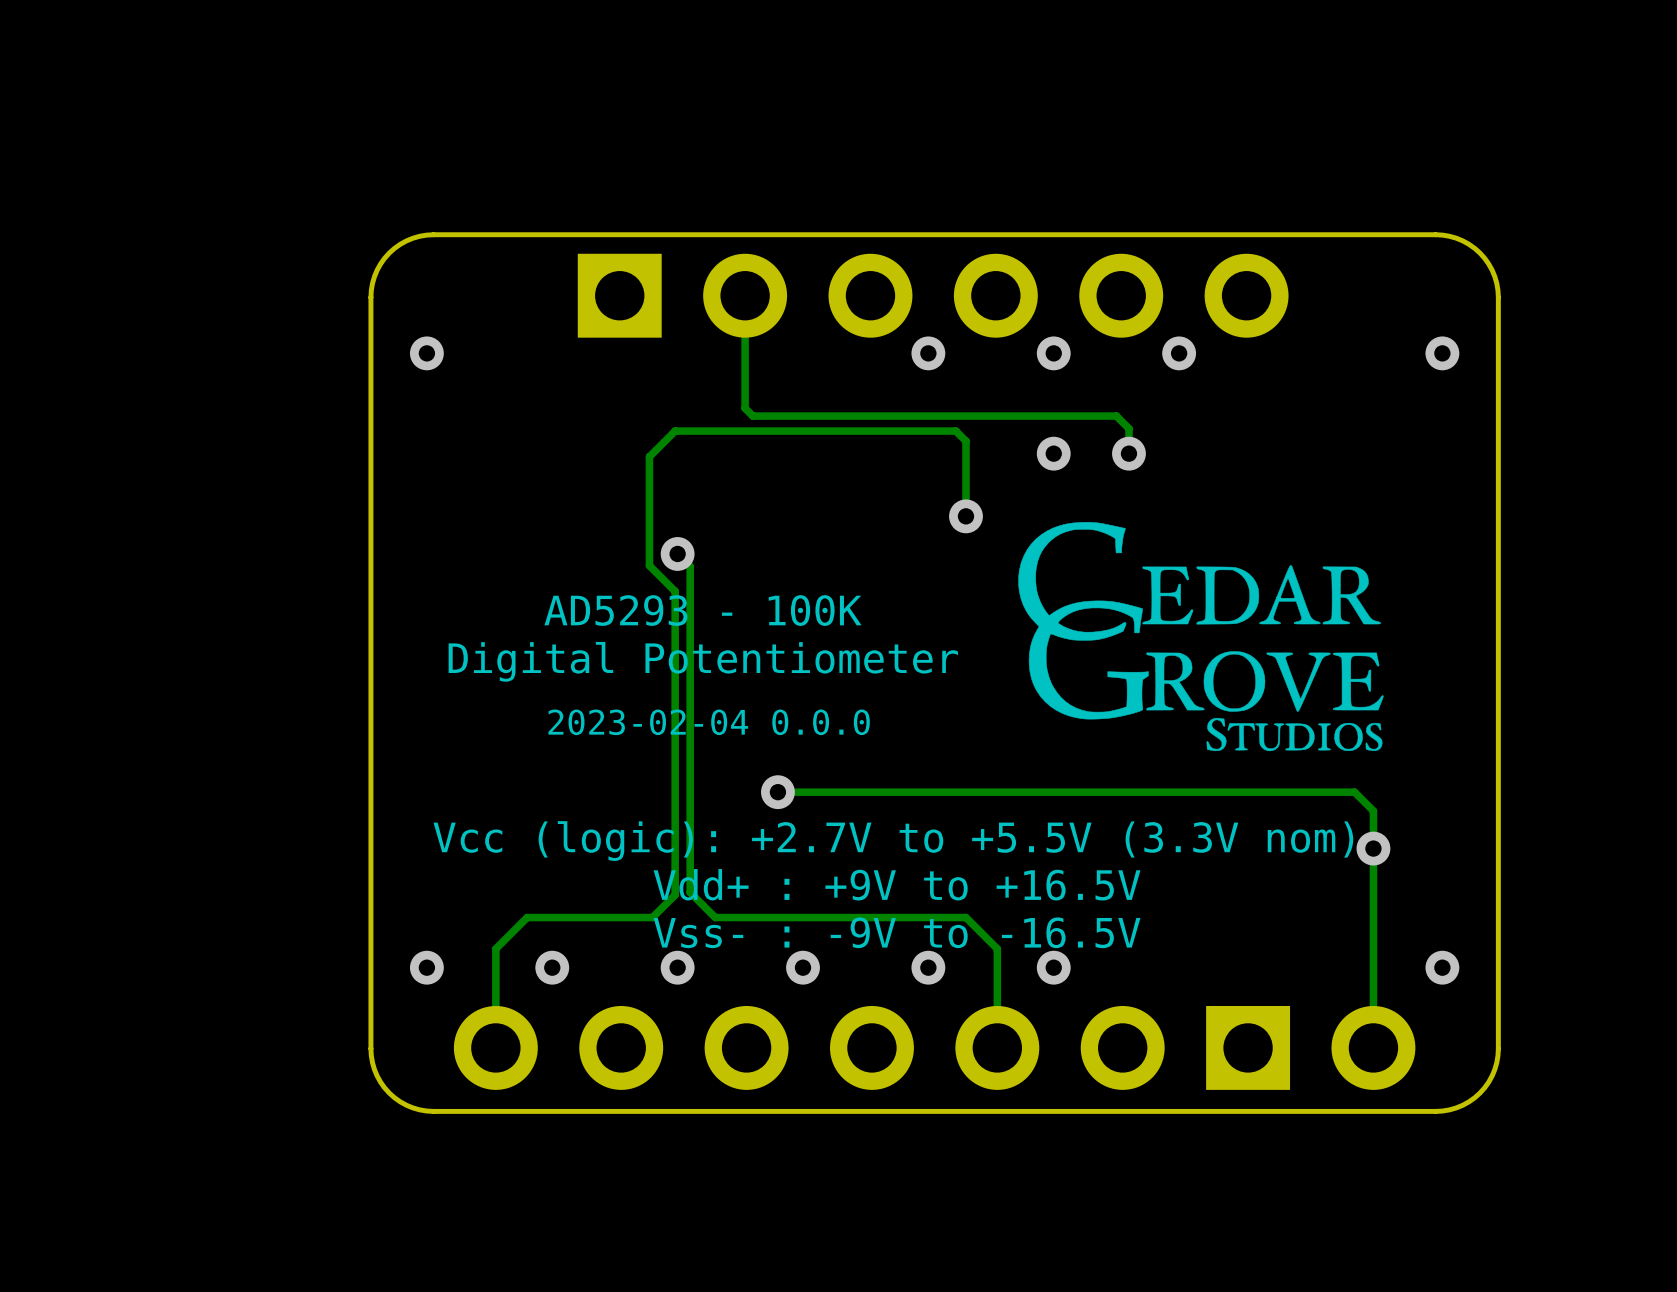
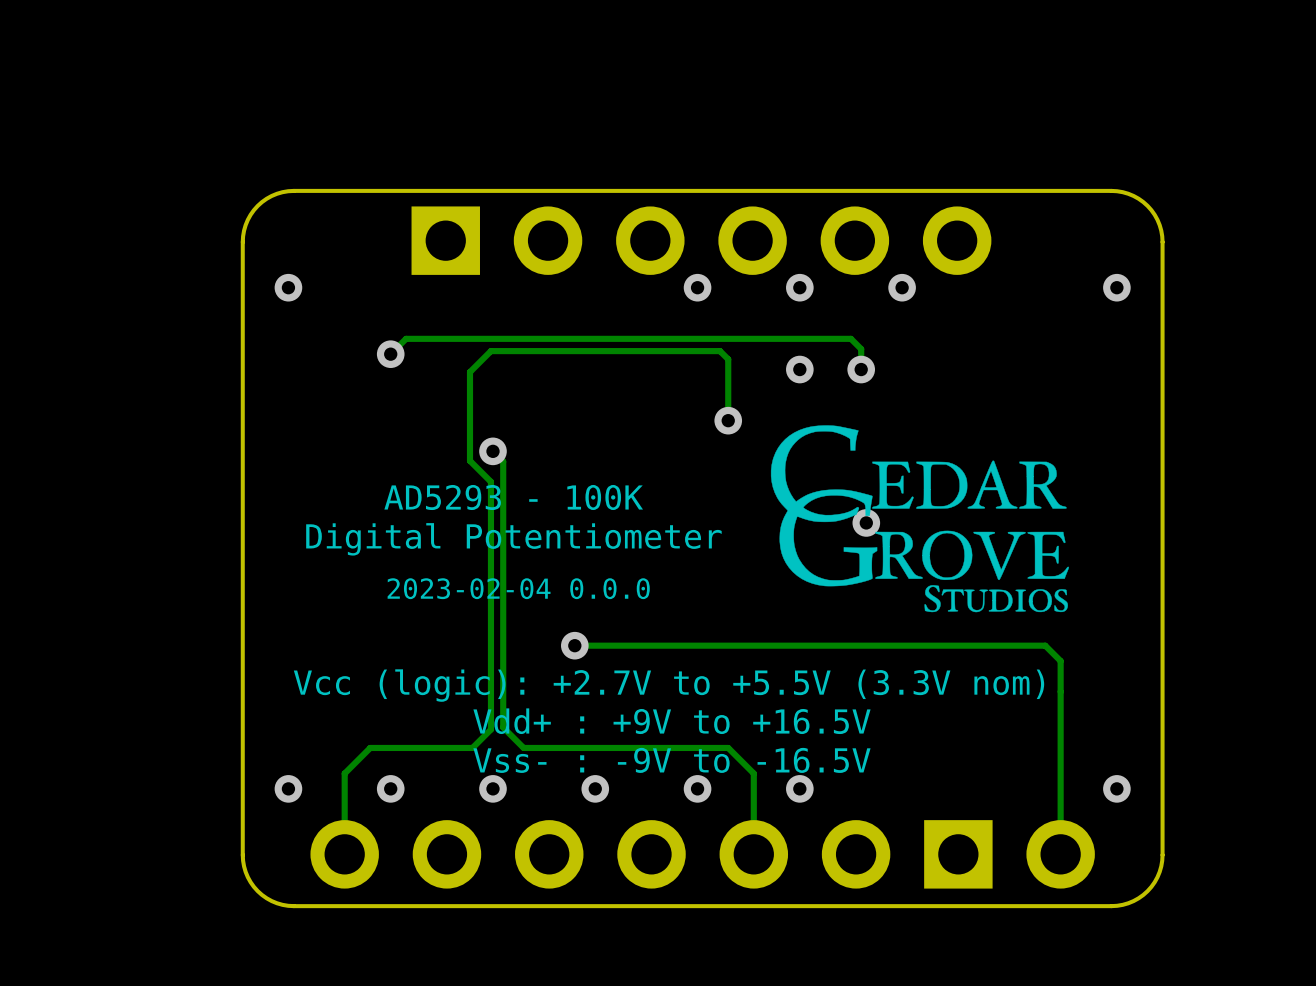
track: (745, 295) (745, 408) (752, 416) -> (390, 354) (406, 338) (554, 338)
via: none -> (390, 354)
via: none -> (866, 522)
via: (1373, 848) -> none

